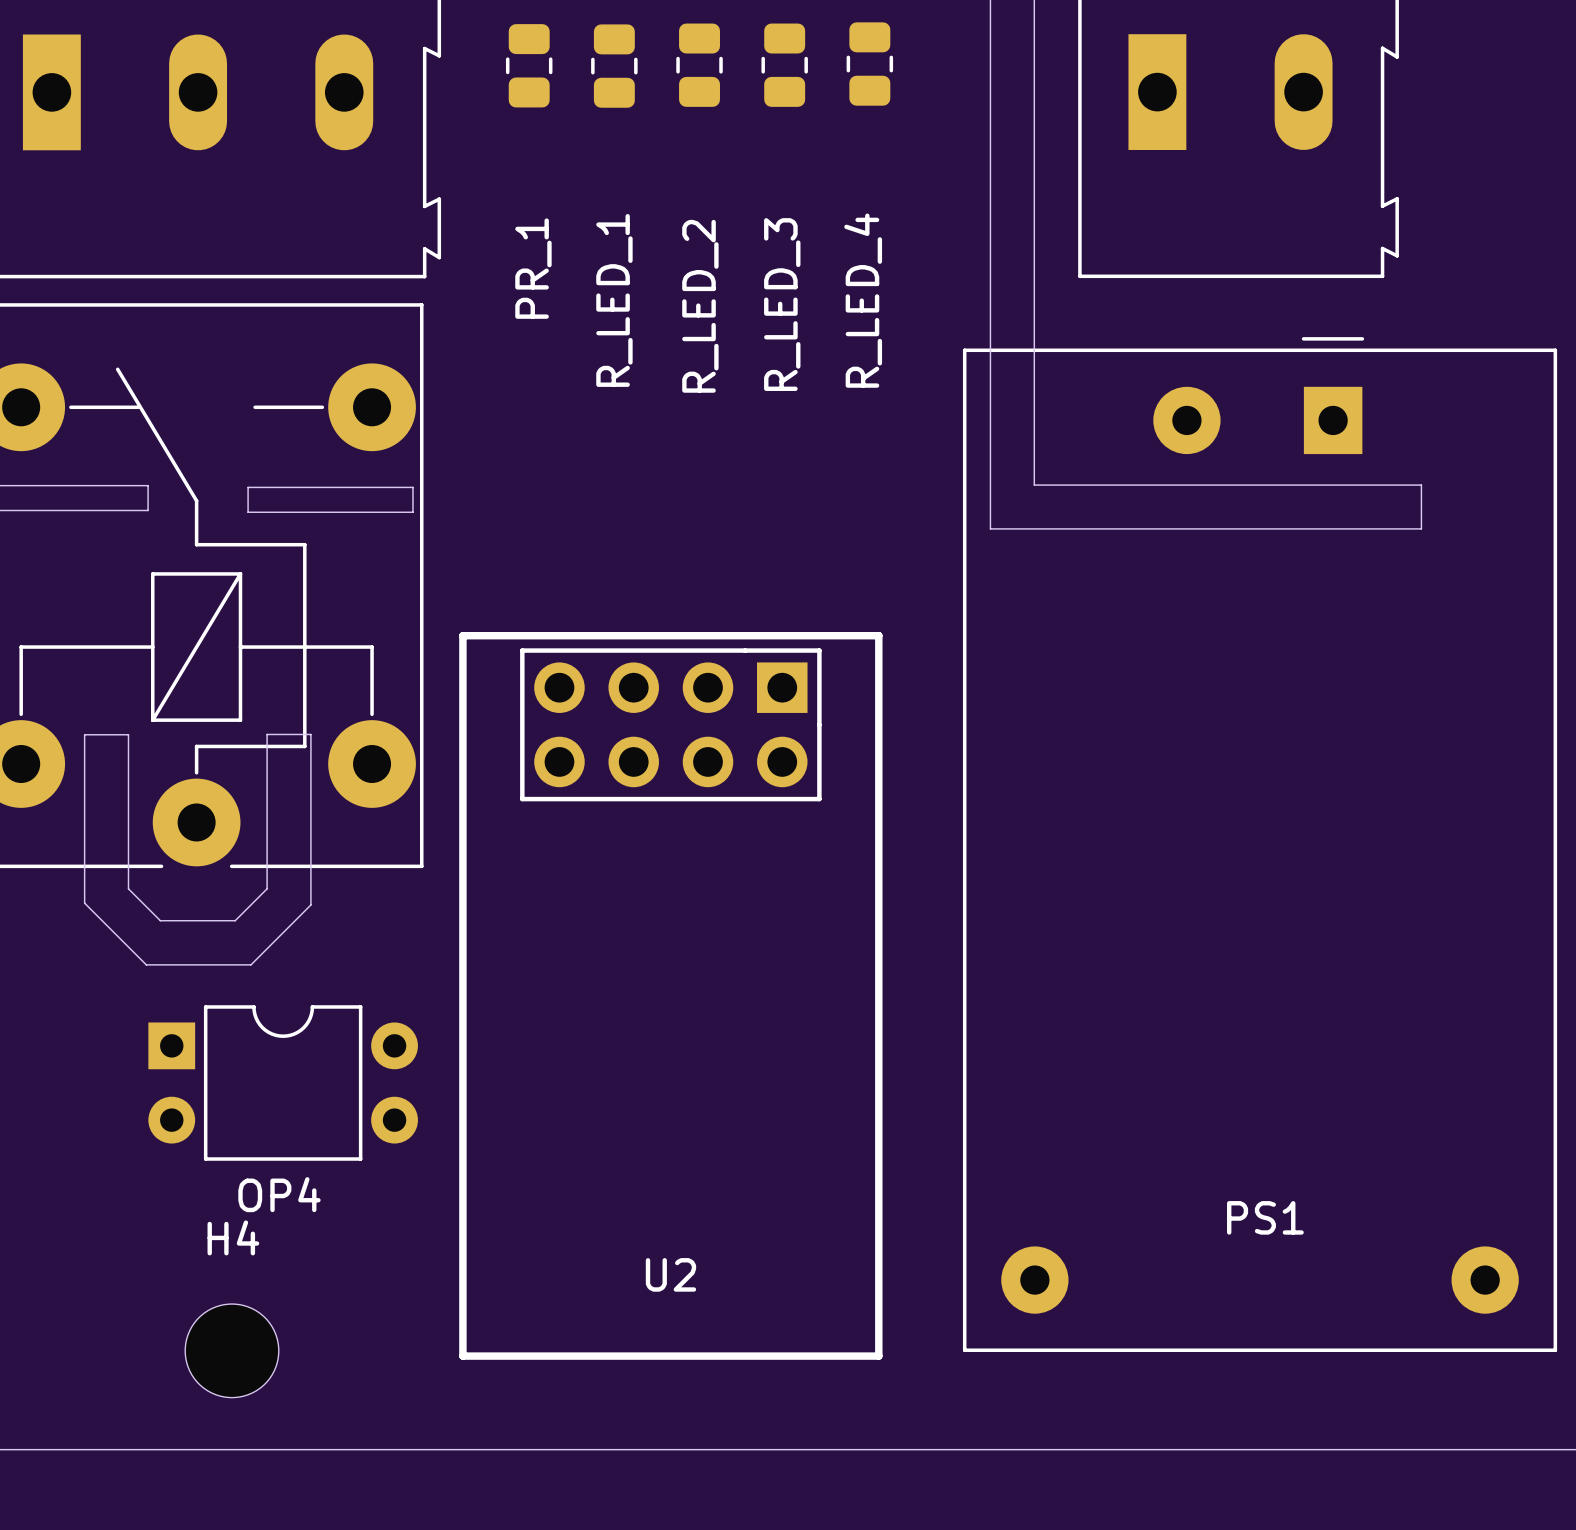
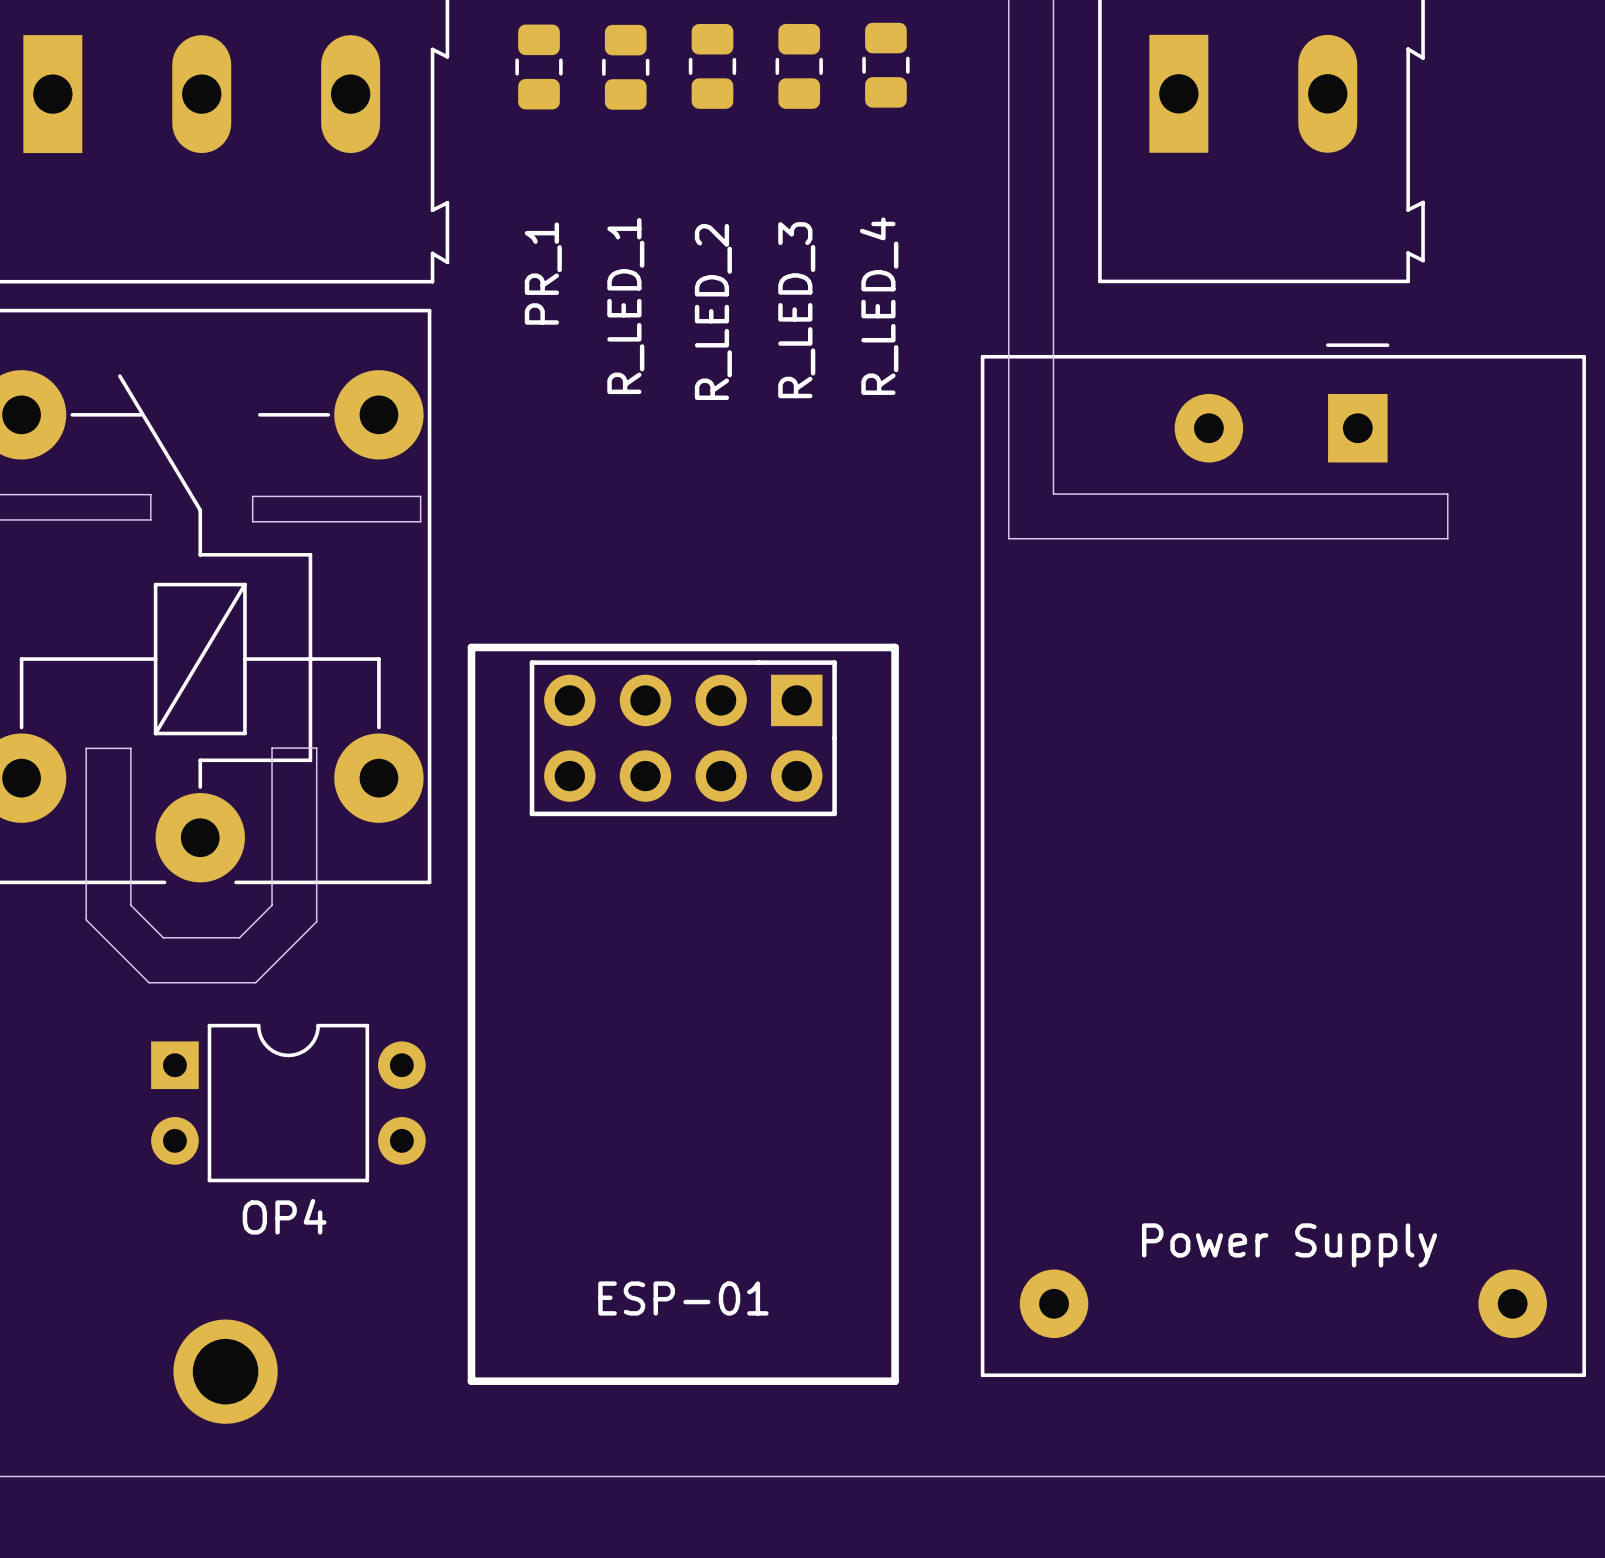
PS1 name: PS1 (1265, 1217) -> Power Supply (1289, 1245)
U2 name: U2 (670, 1274) -> ESP-01 (683, 1298)
part: none -> (225, 1371)
H4: (231, 1350) -> none

